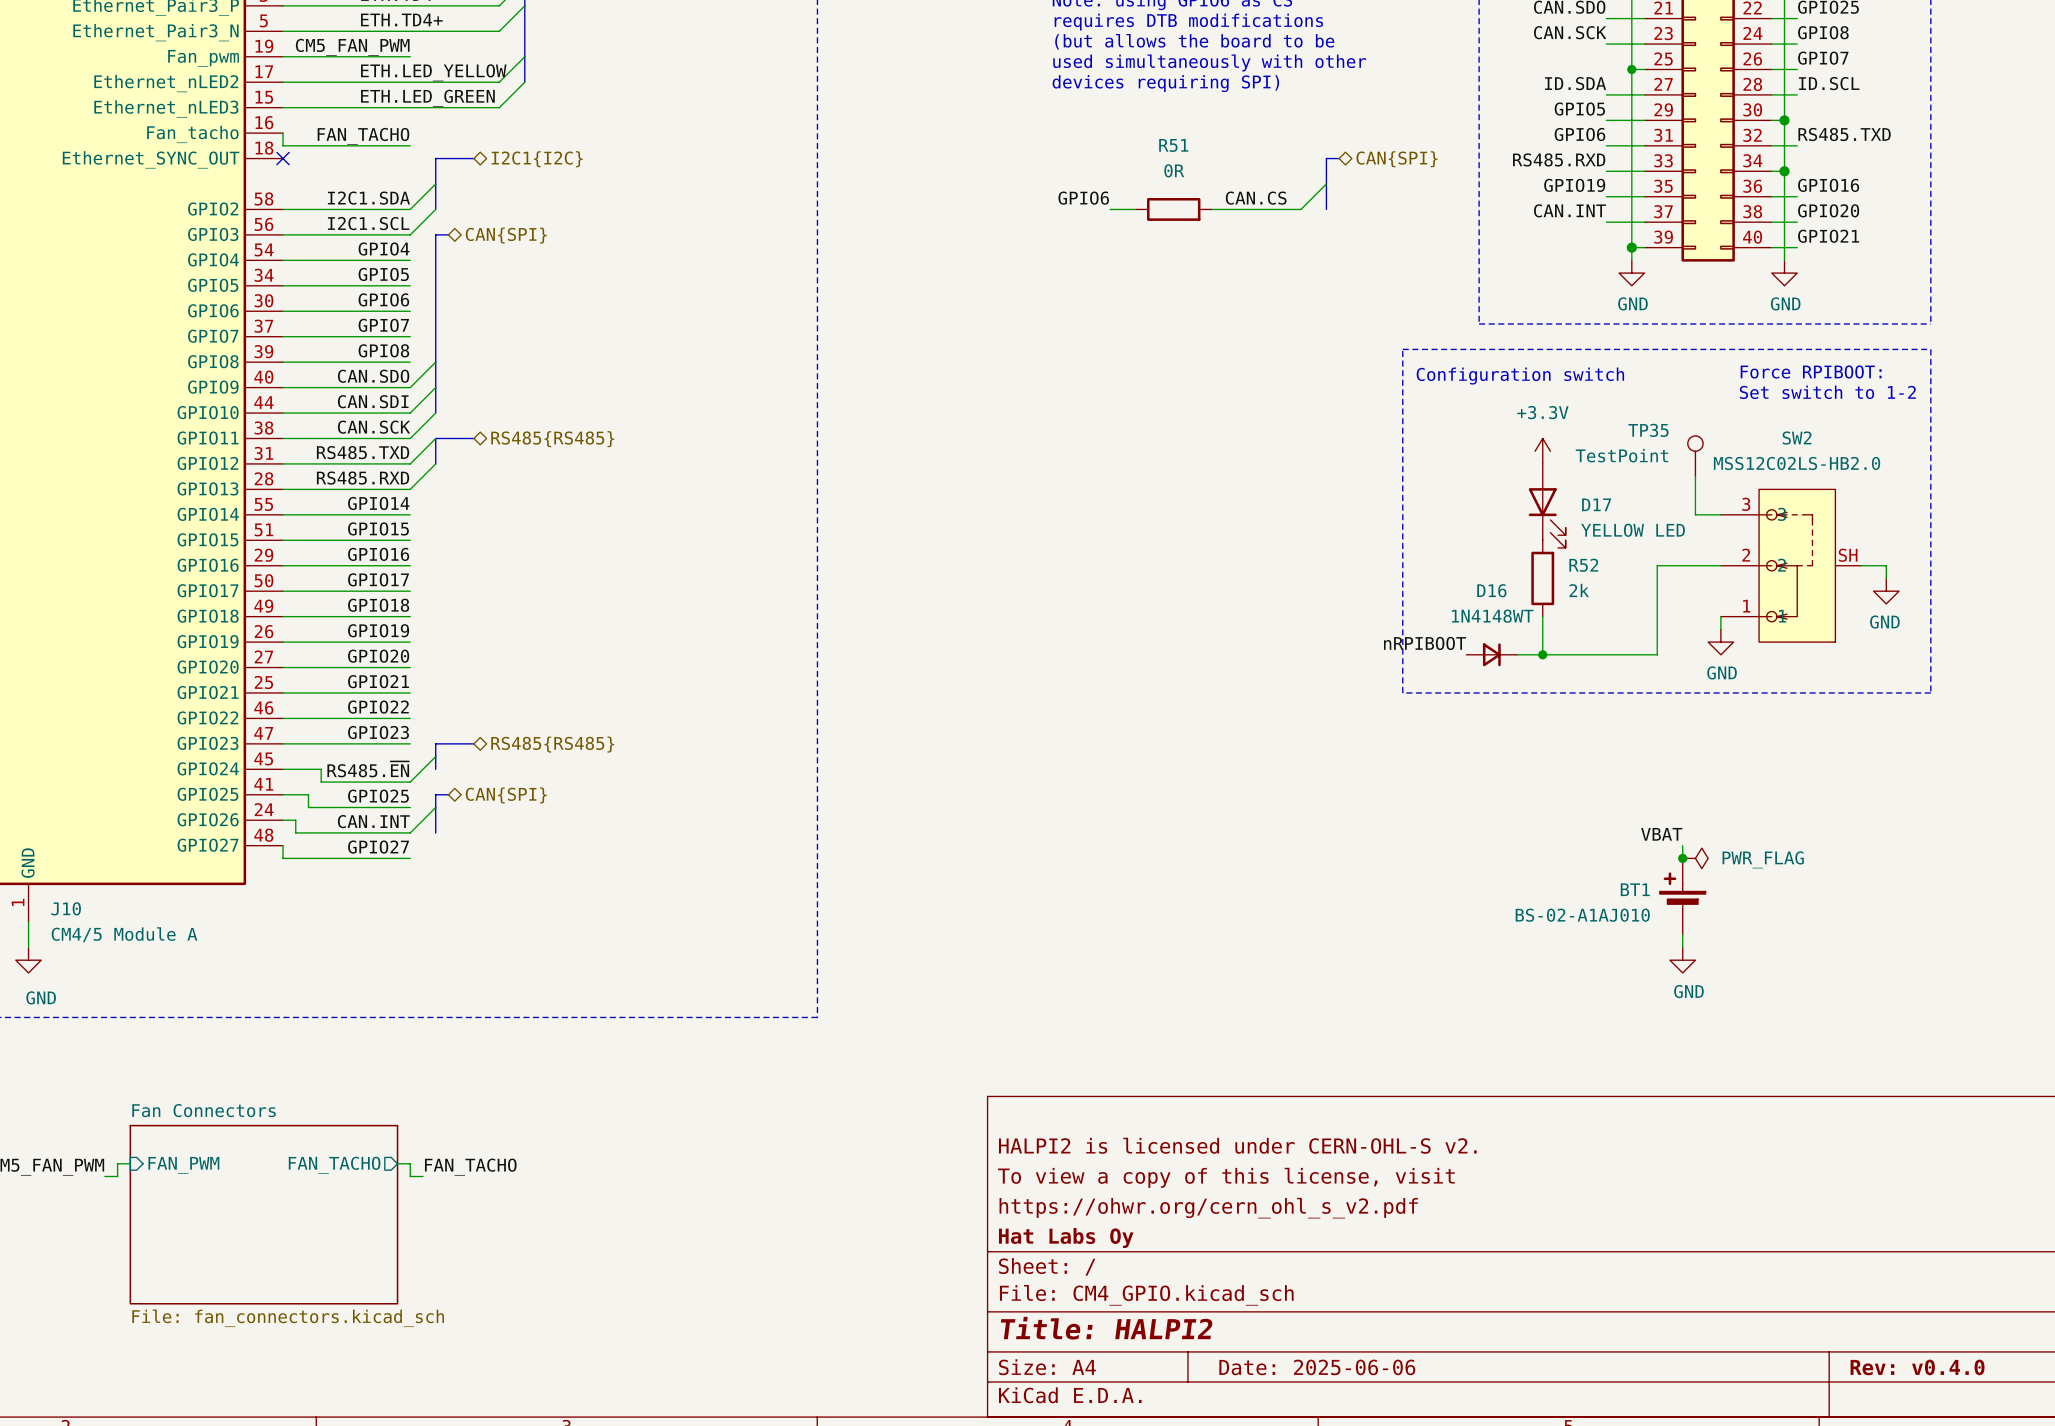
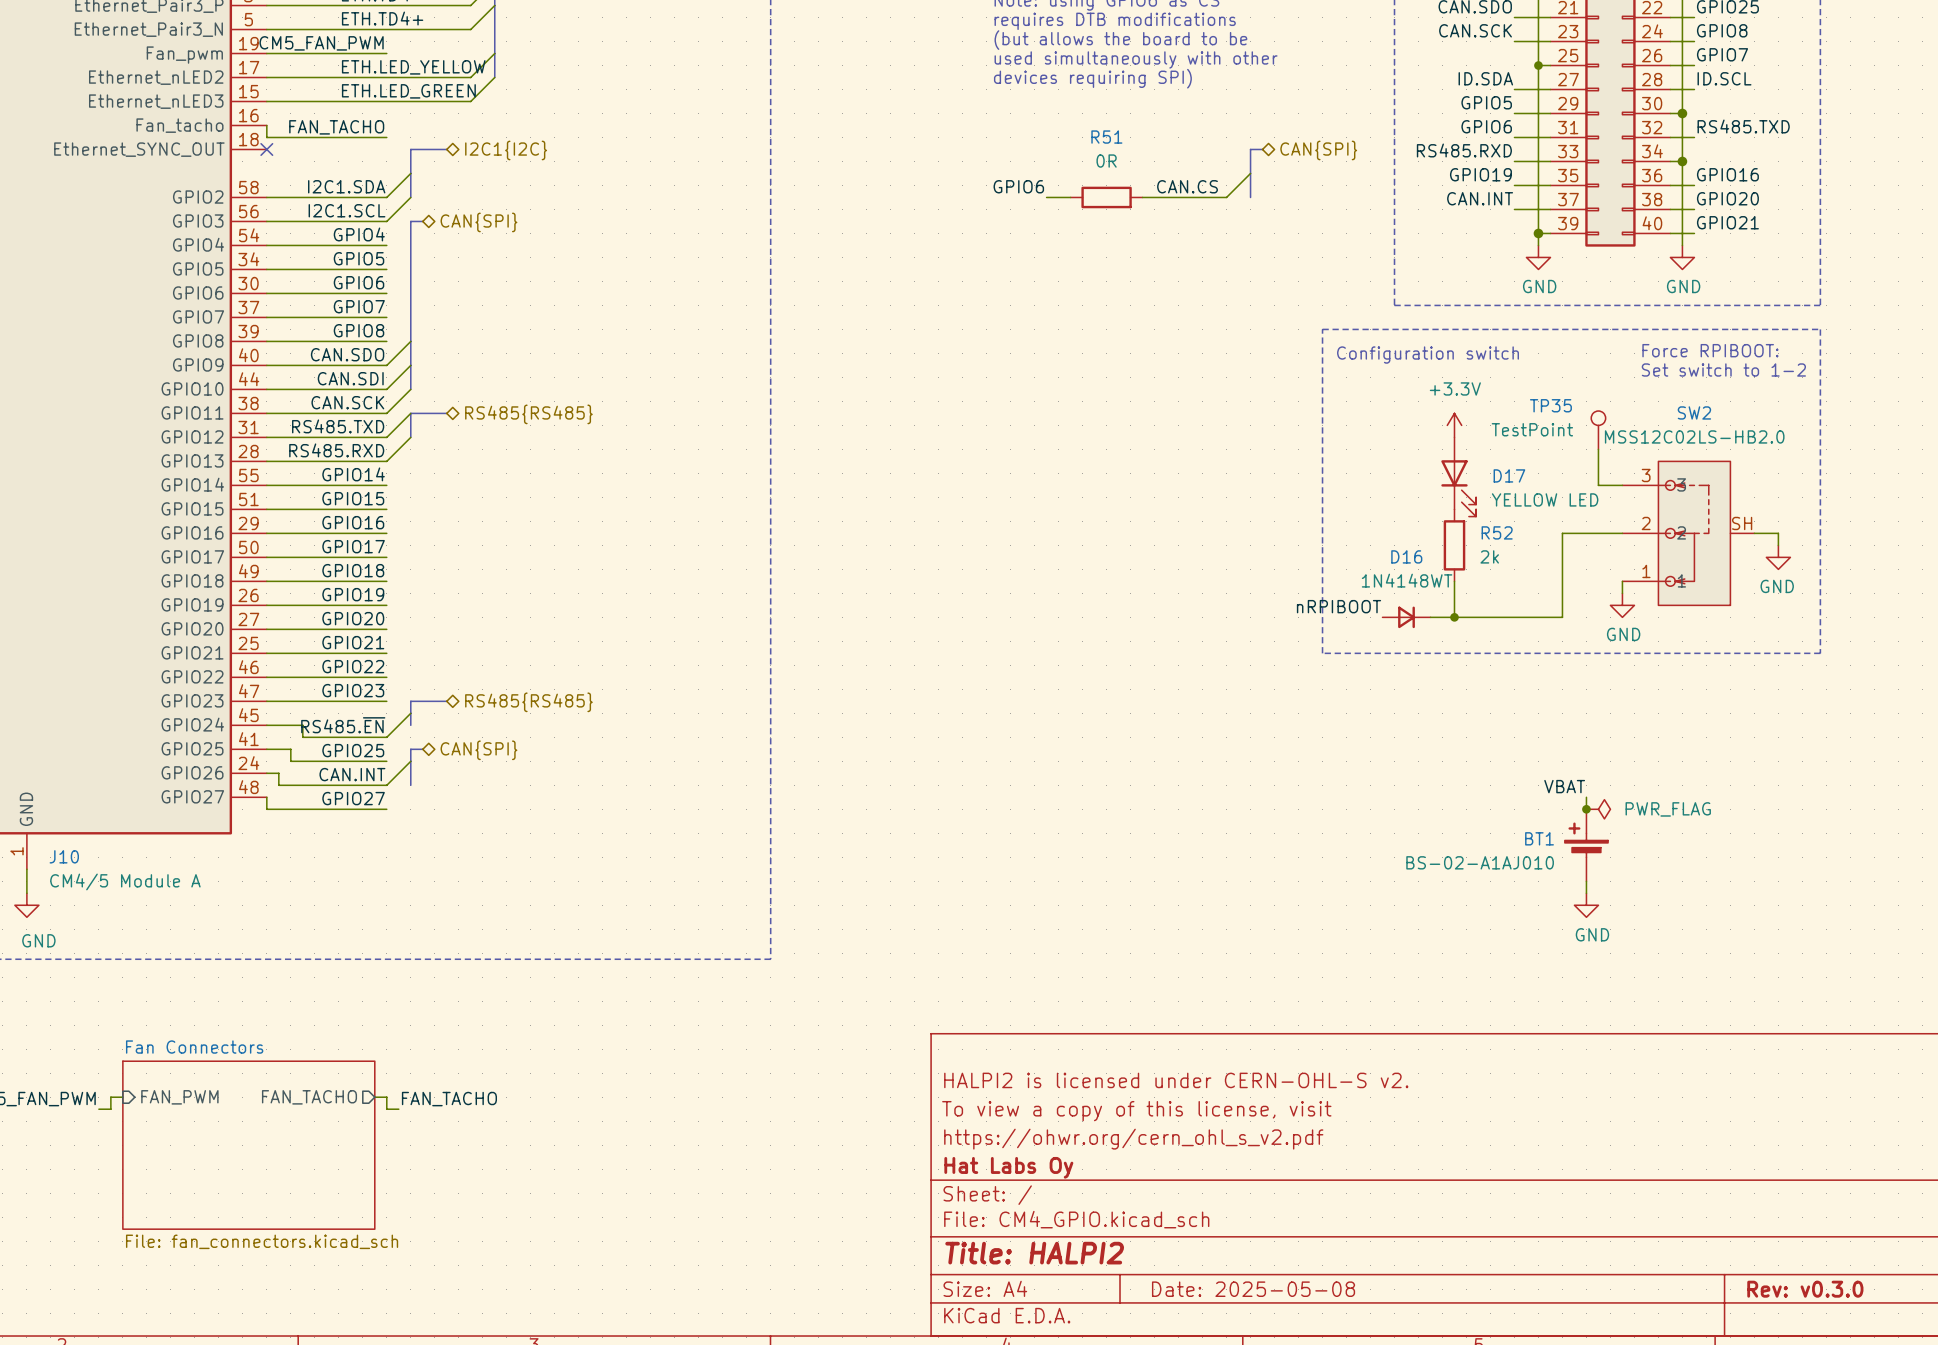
title block: Date: 2025-06-06 (1317, 1367) -> Date: 2025-05-08 (1253, 1289)
title block: Rev: v0.4.0 (1917, 1367) -> Rev: v0.3.0 (1805, 1289)

